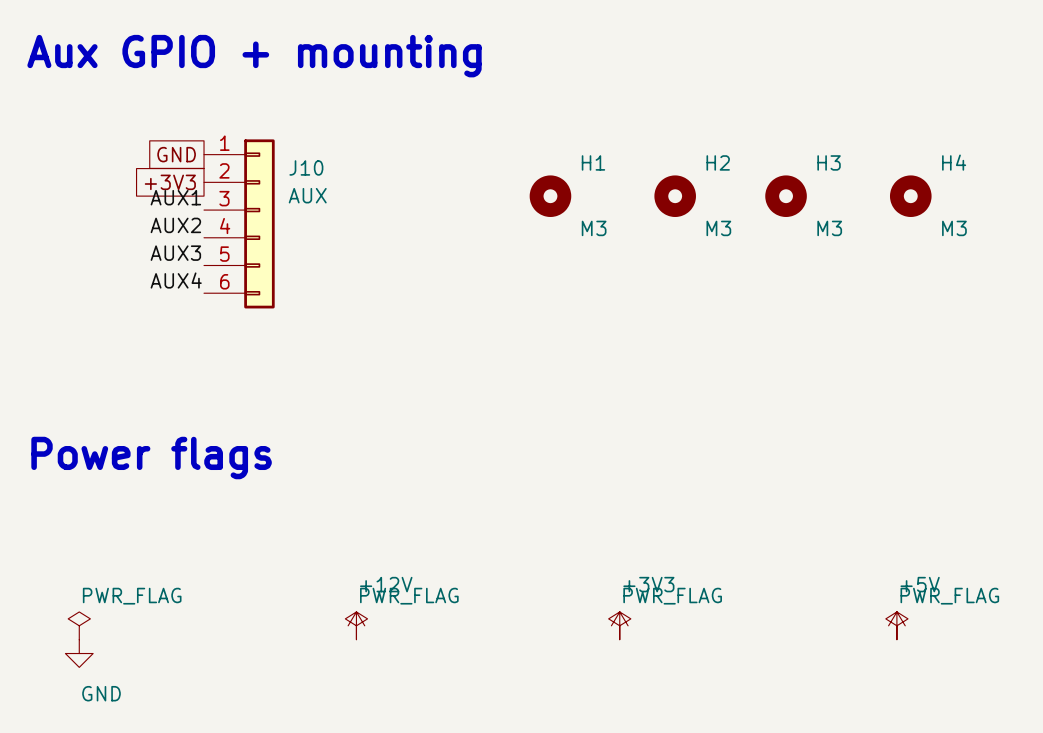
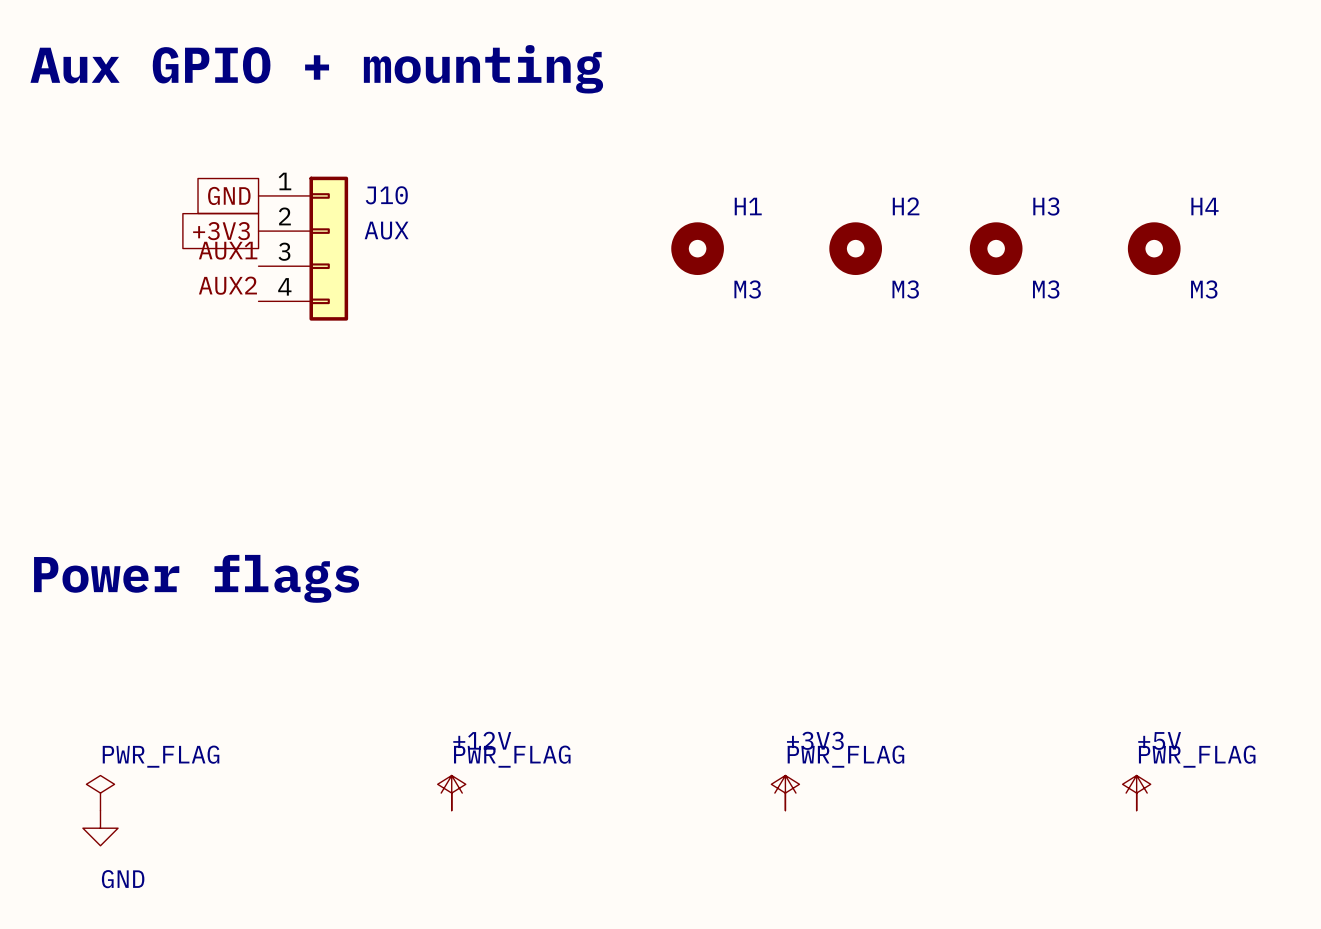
J10 symbol: [204, 139, 275, 309] -> [258, 176, 349, 321]
label: AUX3 (175, 253) -> none
label: AUX4 (176, 280) -> none

